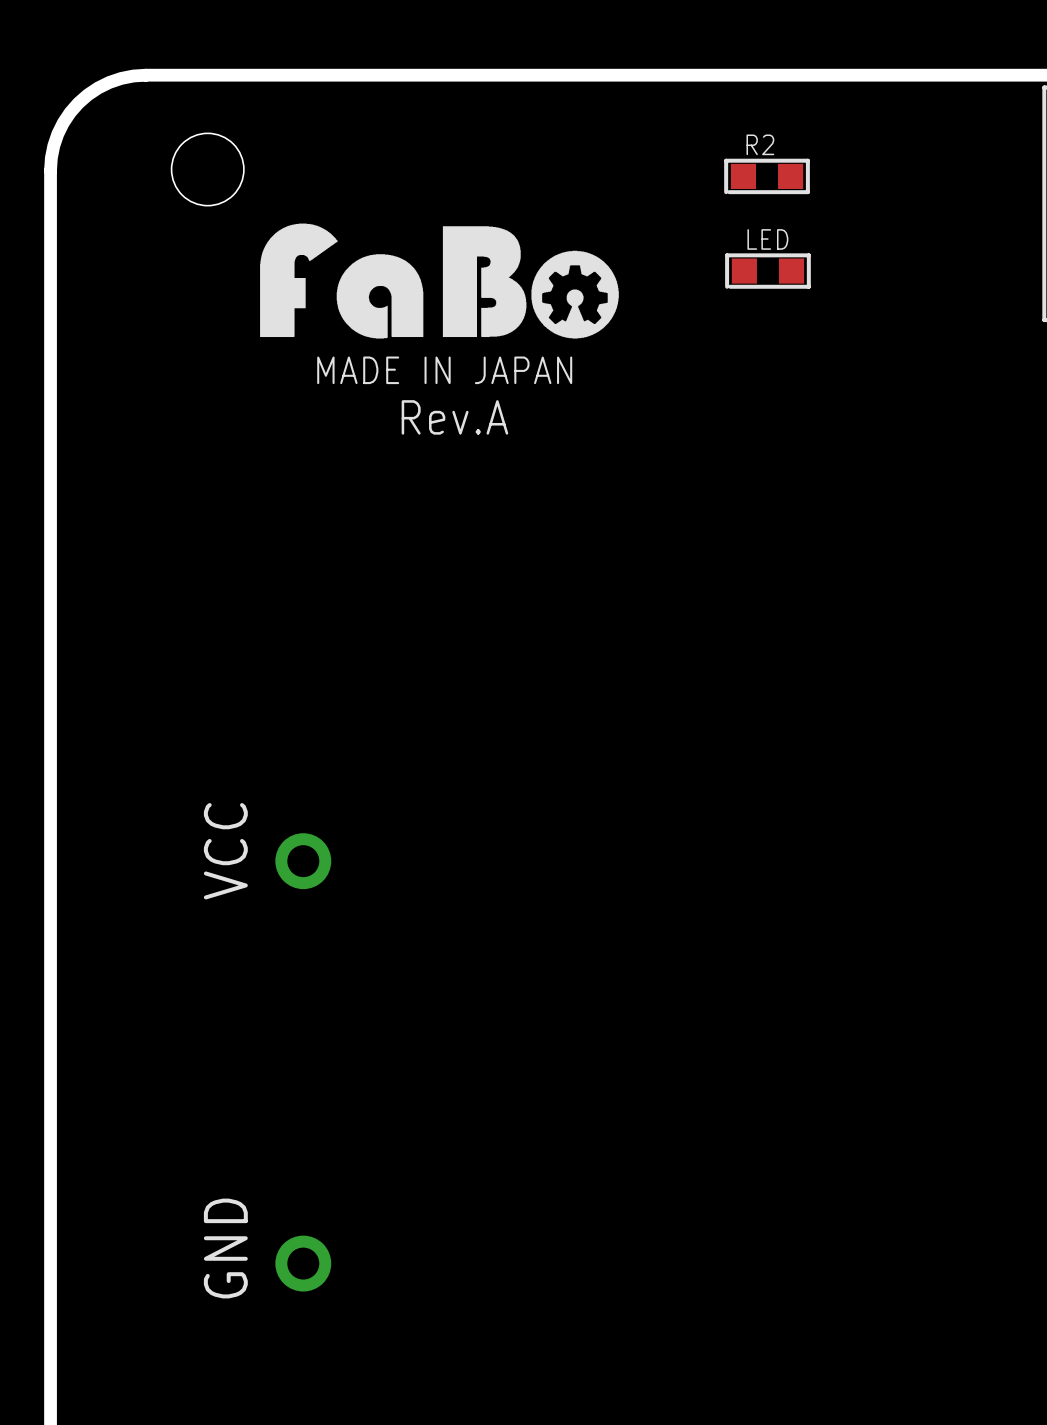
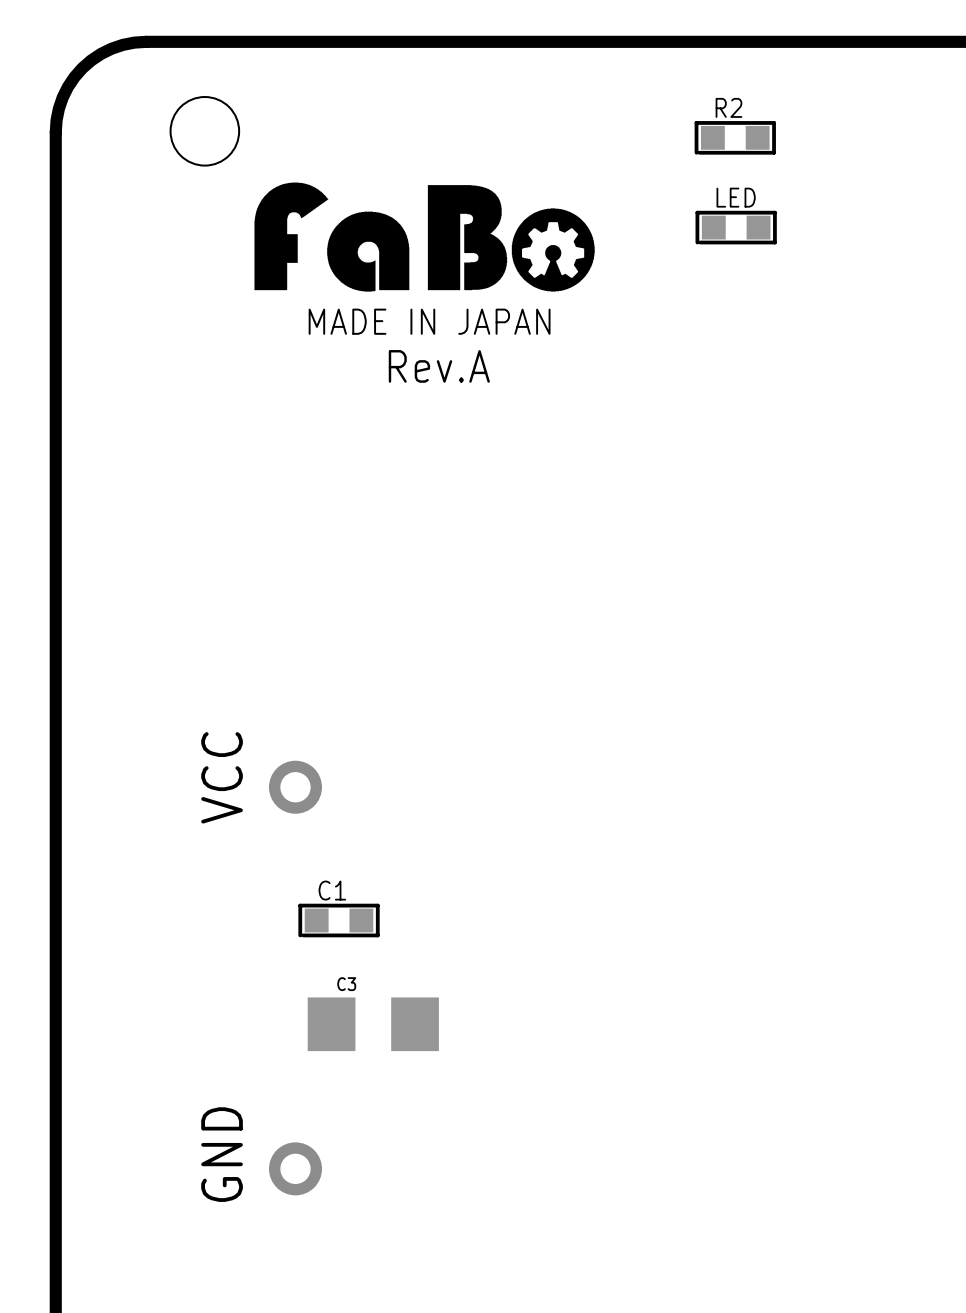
C1: none -> (339, 920)
C3: none -> (373, 1024)

